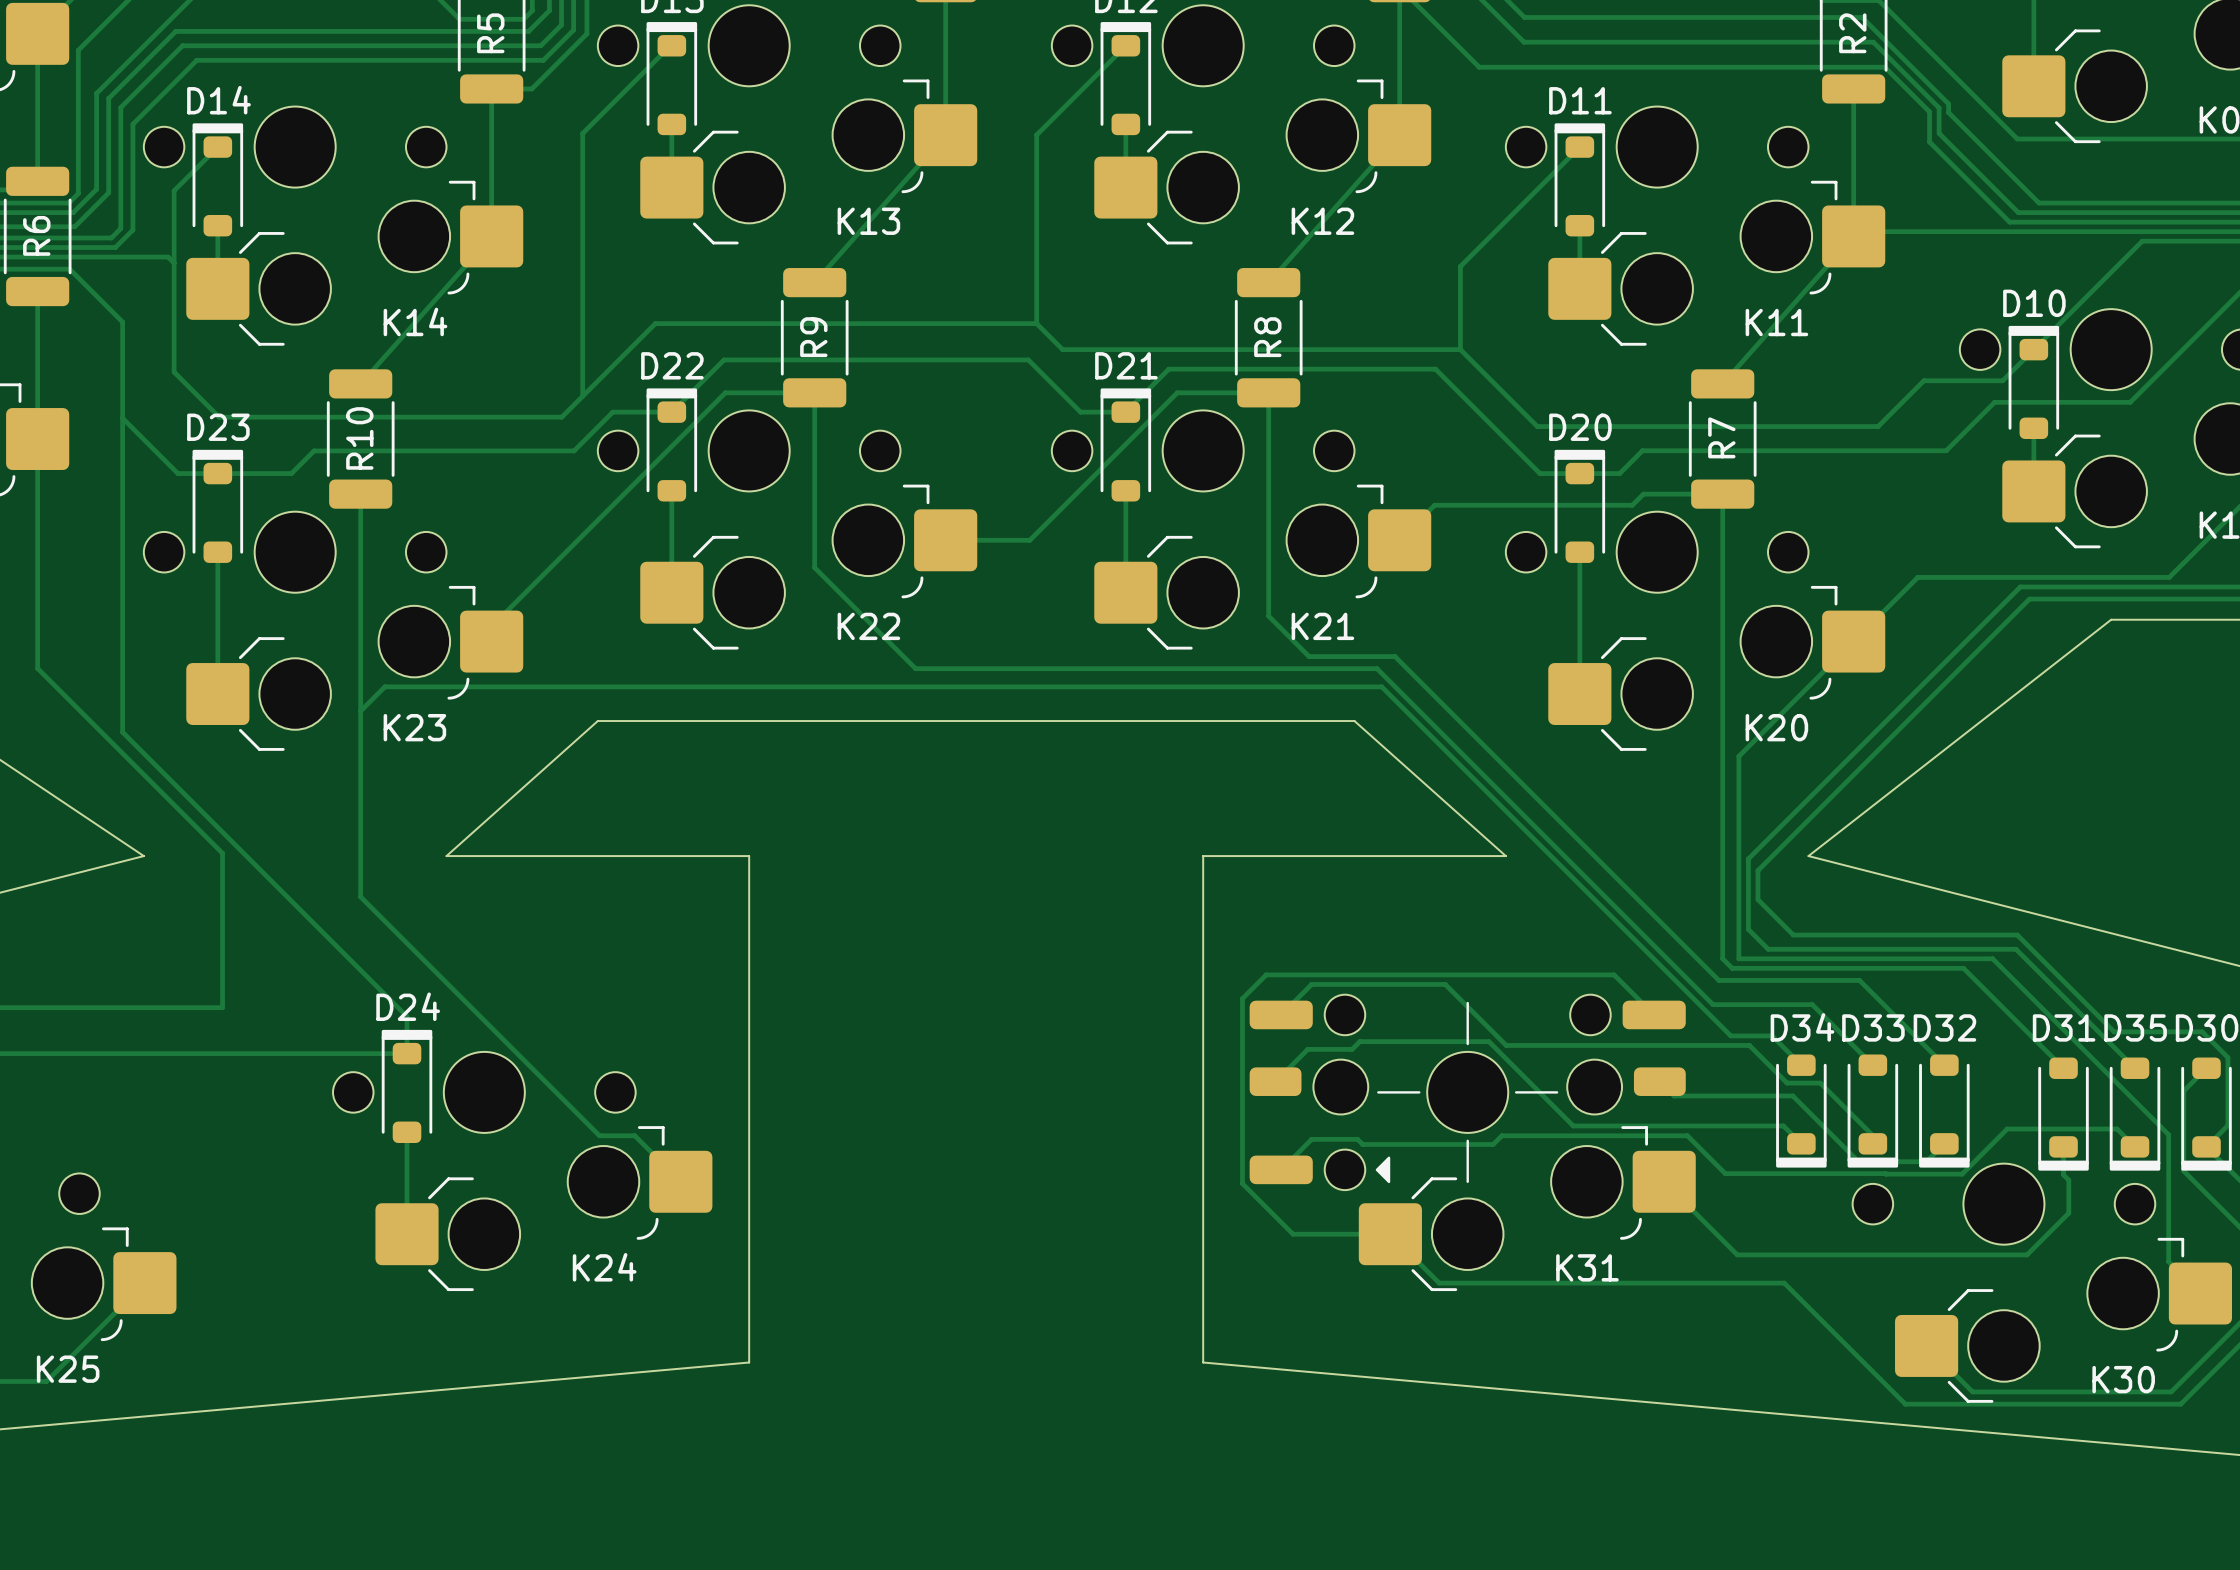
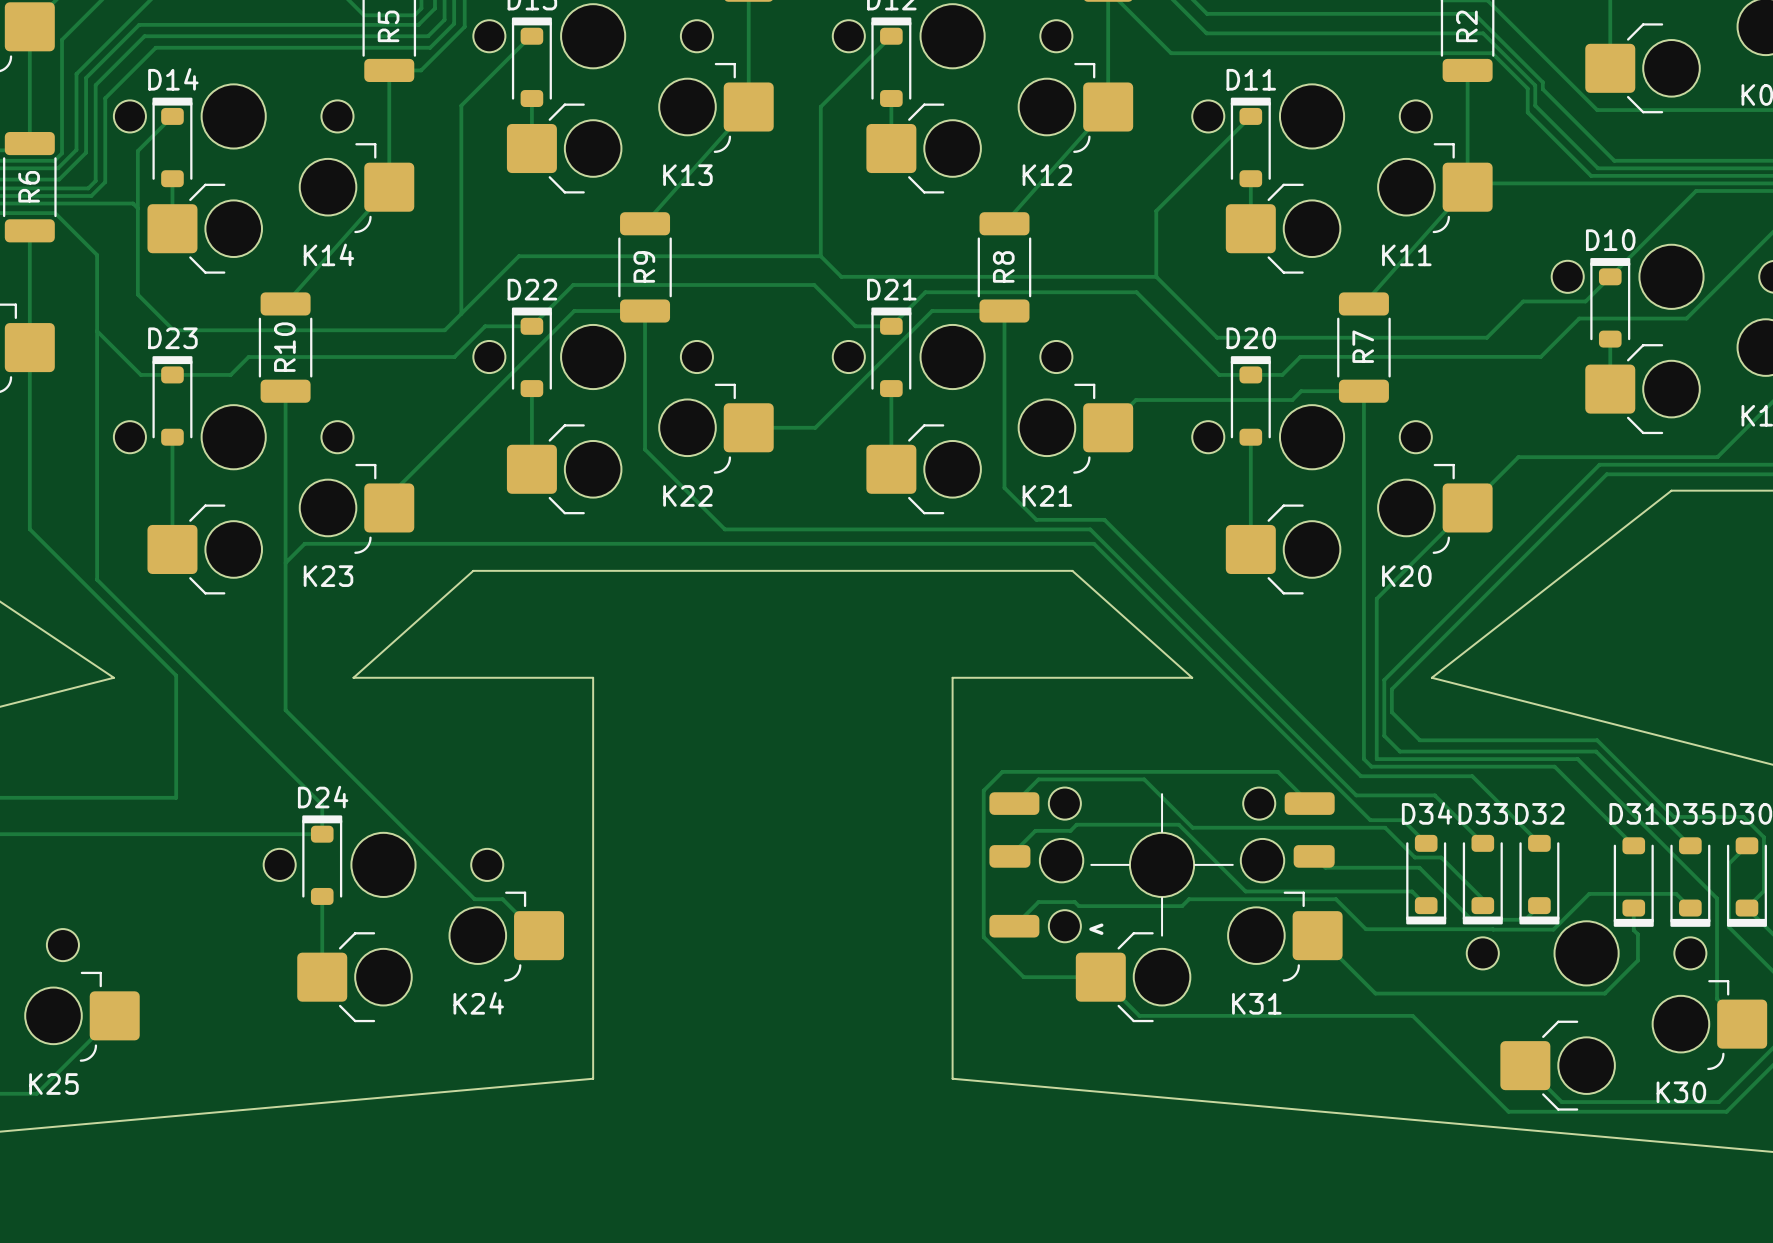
K31 footprint: [1249, 994, 1696, 1292] -> [989, 787, 1343, 1023]

